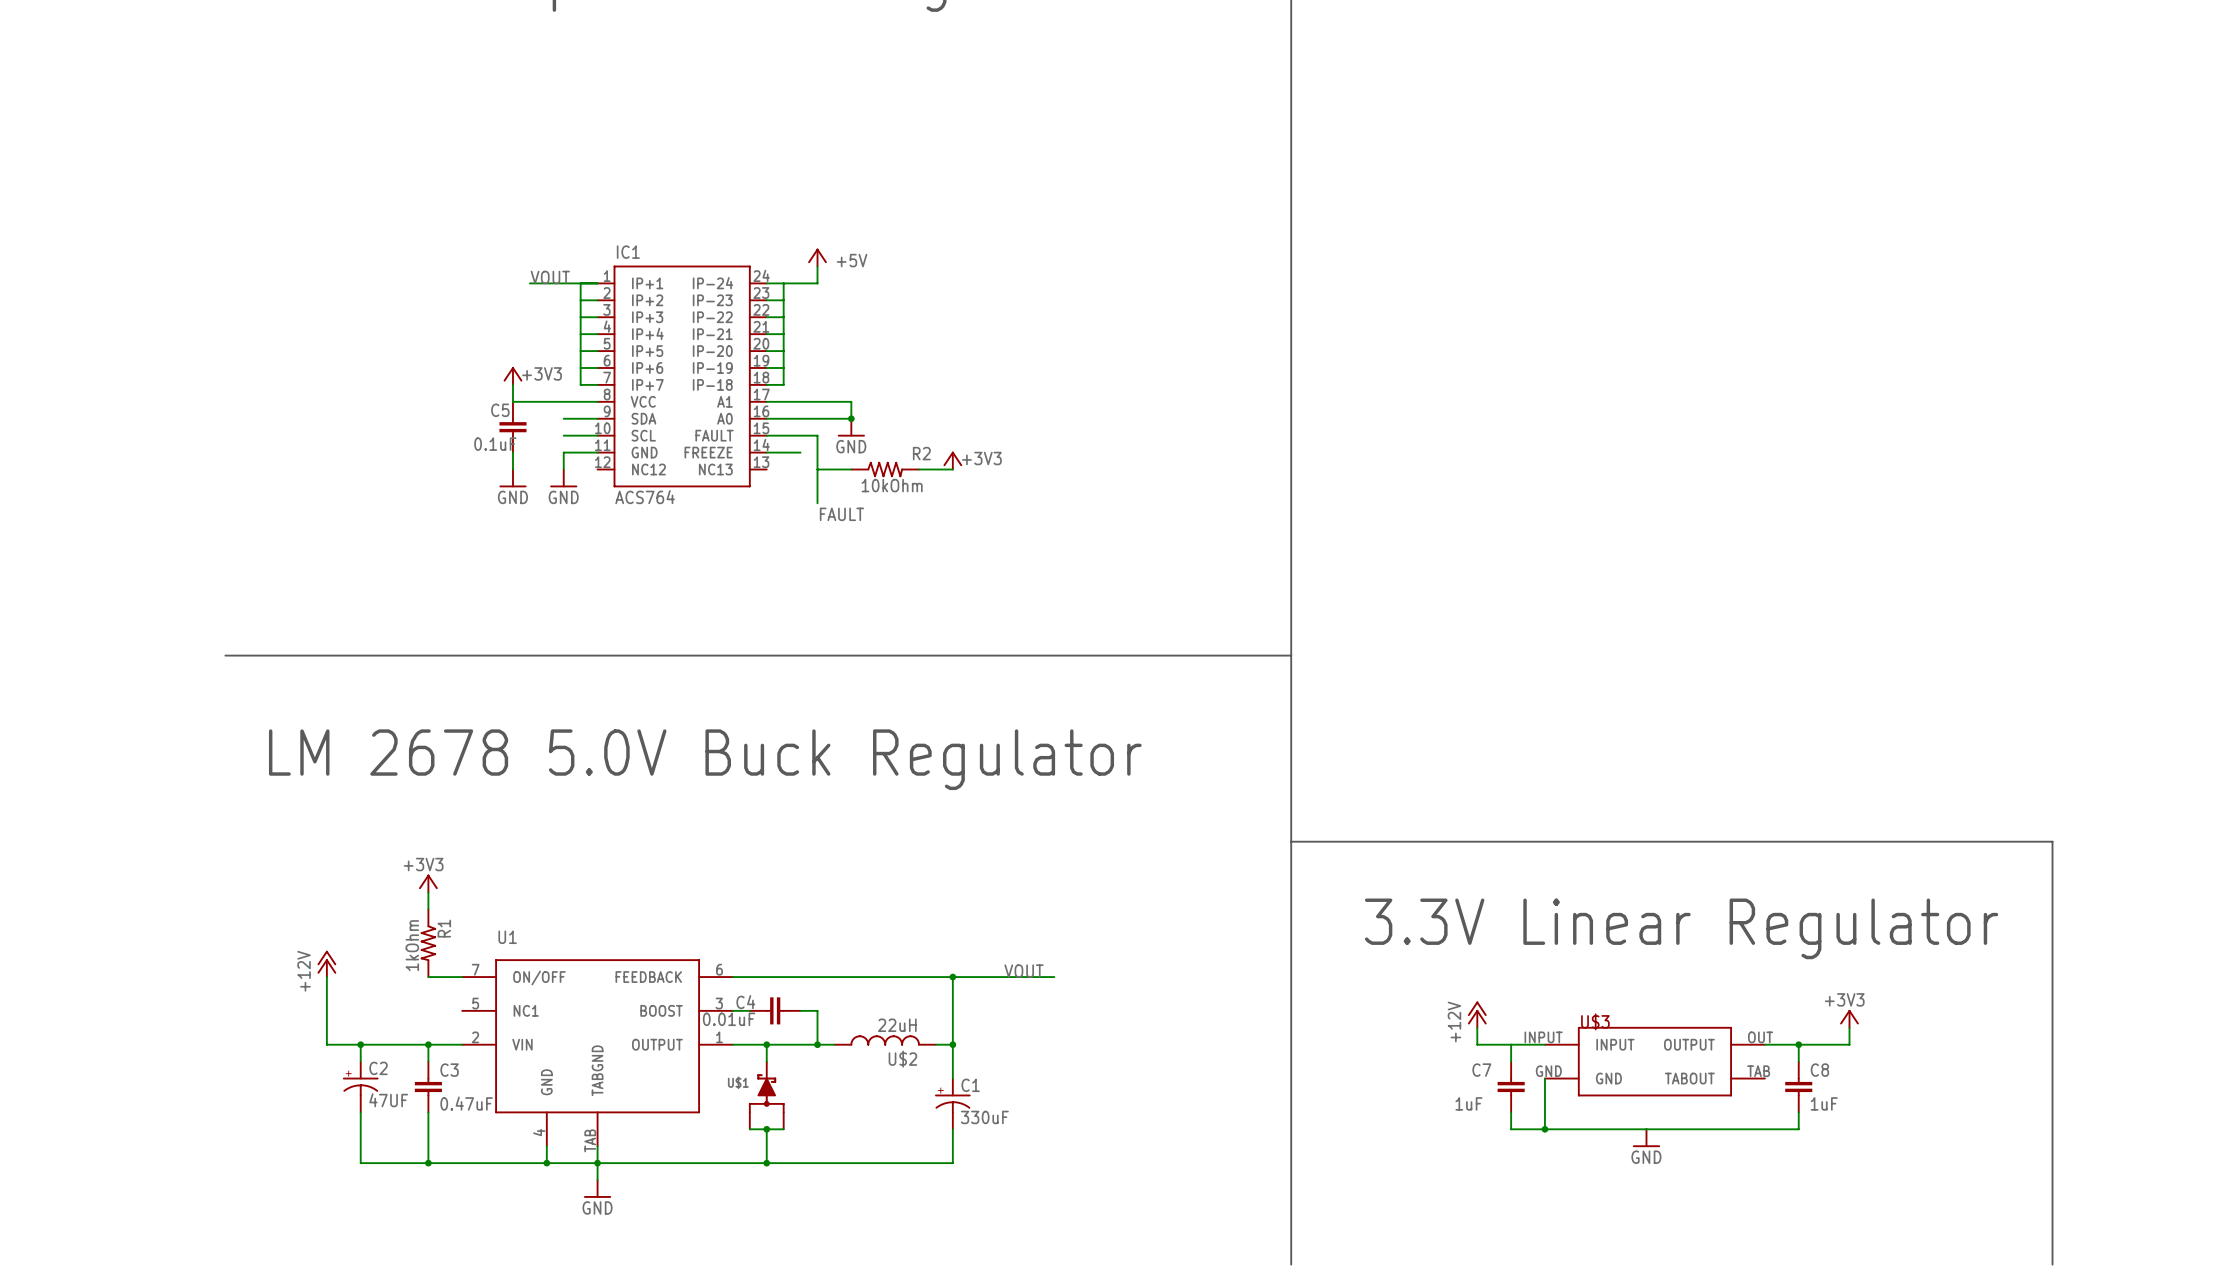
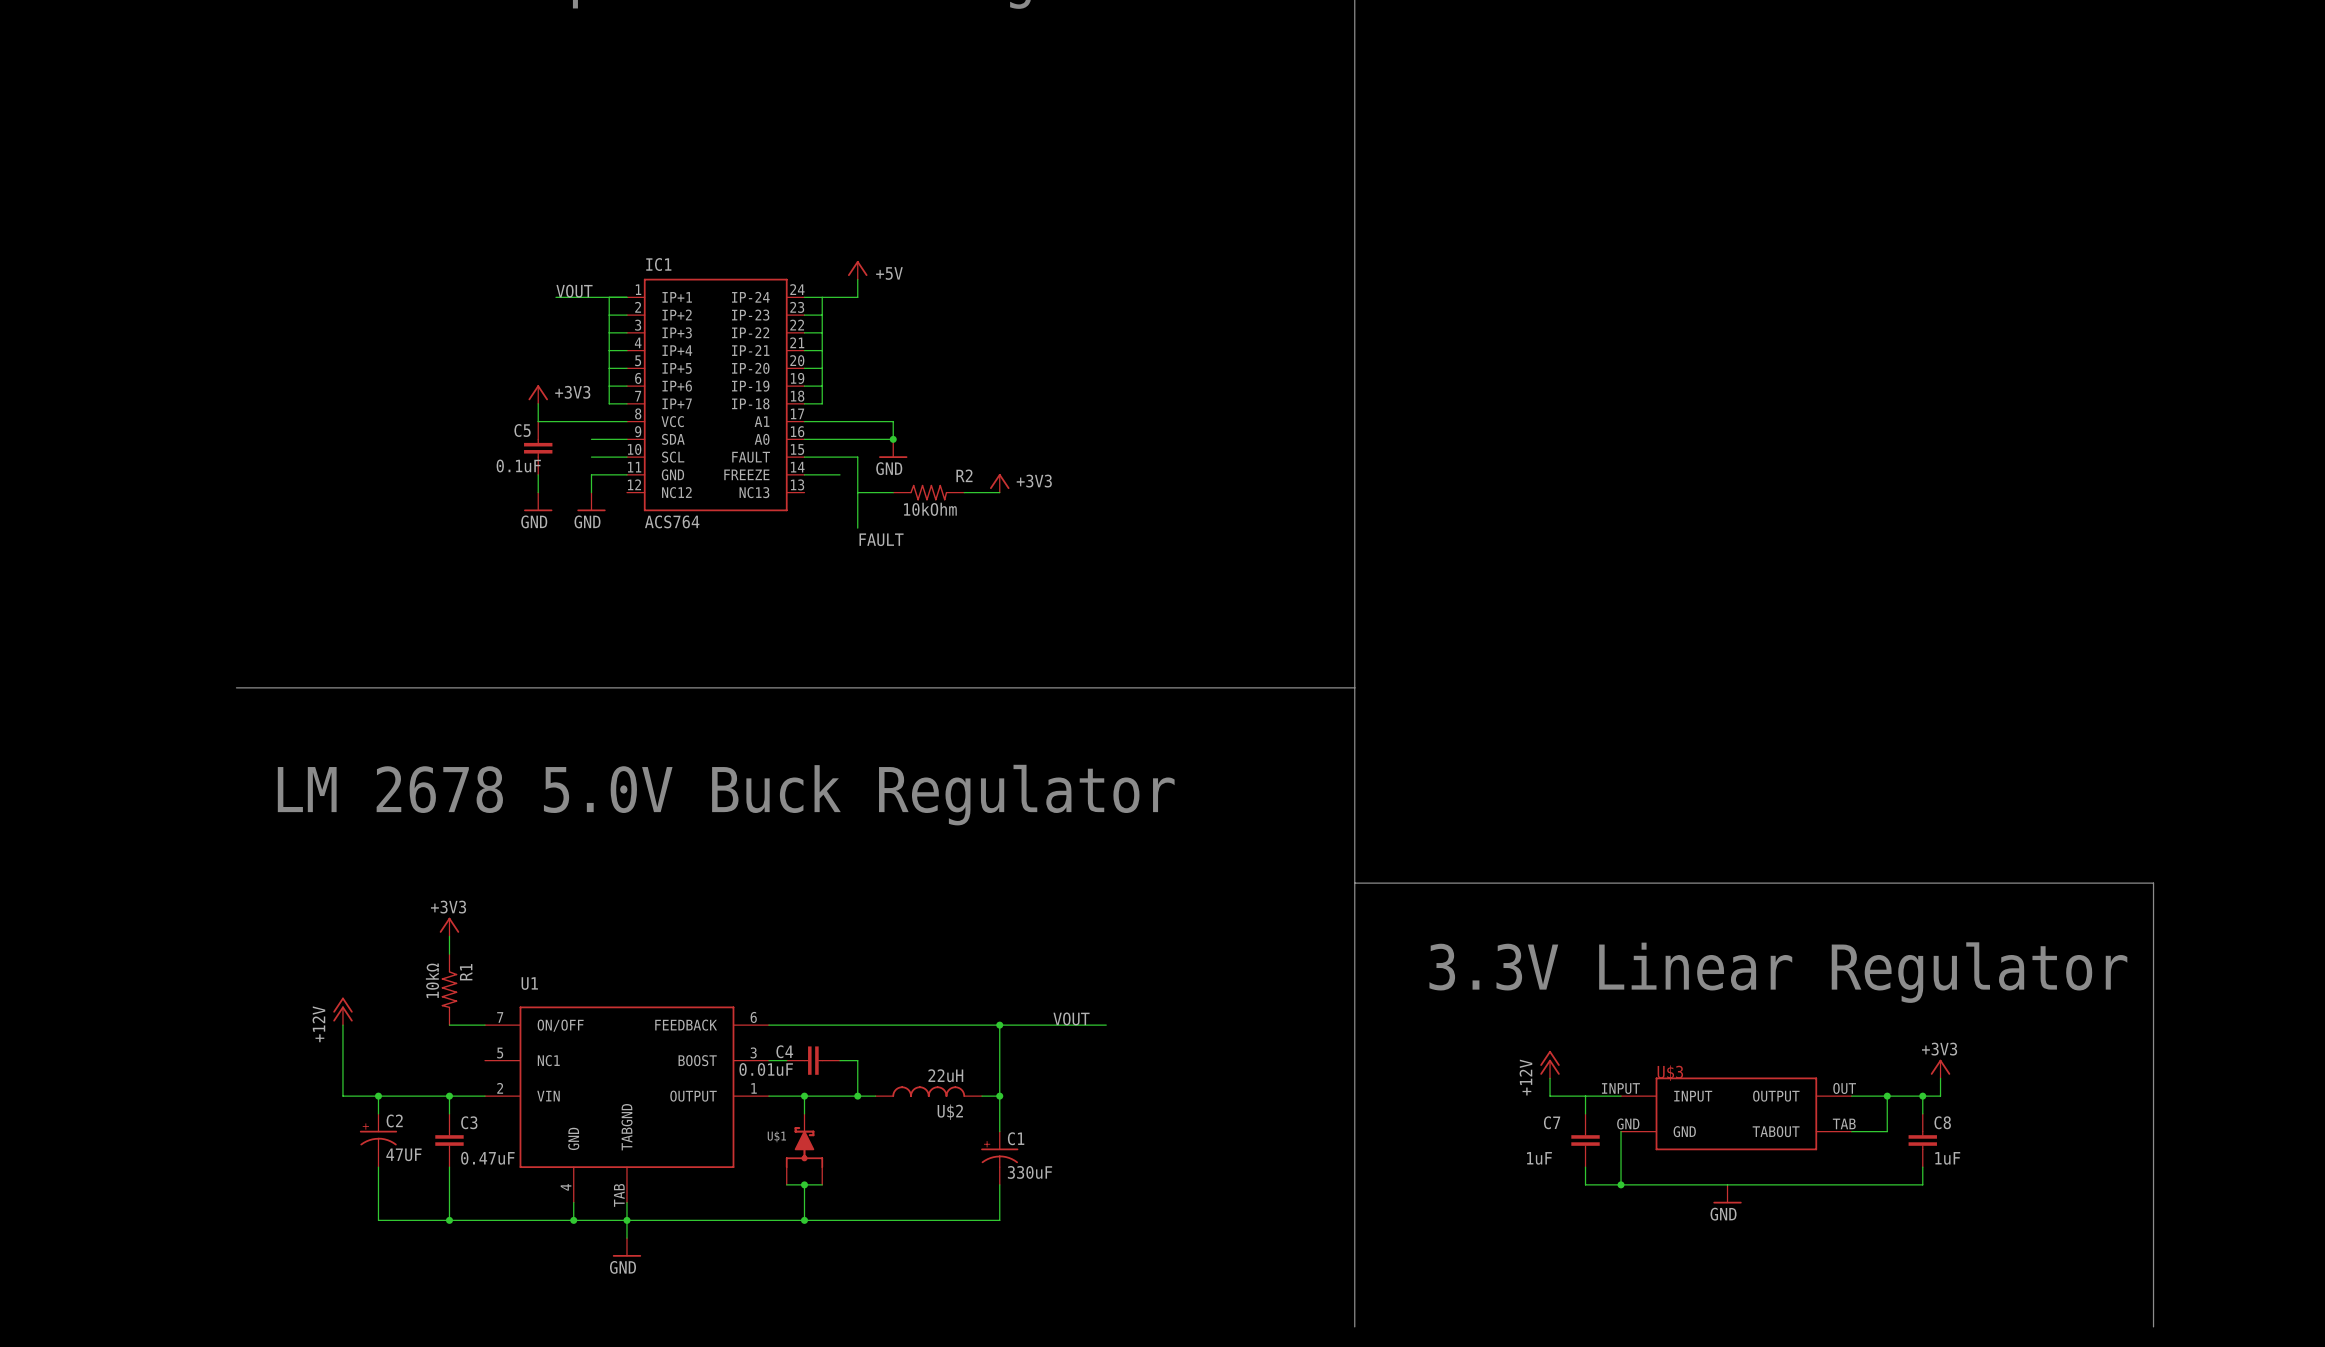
R1 value: 1kOhm (412, 945) -> 10kΩ (432, 980)
wire: none -> (1922, 1096) (1922, 1113)
junction: none -> (1922, 1096)
wire: none -> (1887, 1113) (1887, 1131) (1851, 1131)
C8 position: (1798, 1087) -> (1922, 1140)
wire: (1798, 1112) (1798, 1129) -> (1922, 1167) (1922, 1184) (1887, 1184)

